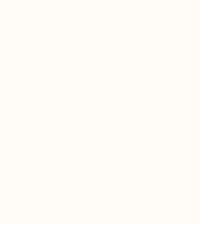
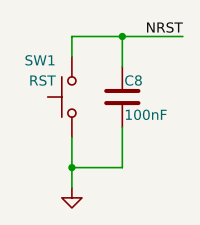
label: none -> NRST (164, 27)
wire: none -> (122, 36) (122, 66)
junction: none -> (122, 36)
wire: none -> (182, 36) (71, 36) (71, 56)
SW1: none -> RST (61, 97)
C8: none -> 100nF (122, 97)
wire: none -> (122, 127) (122, 167) (71, 167)
wire: none -> (71, 137) (71, 187)
junction: none -> (71, 167)
power symbol: none -> (71, 197)

